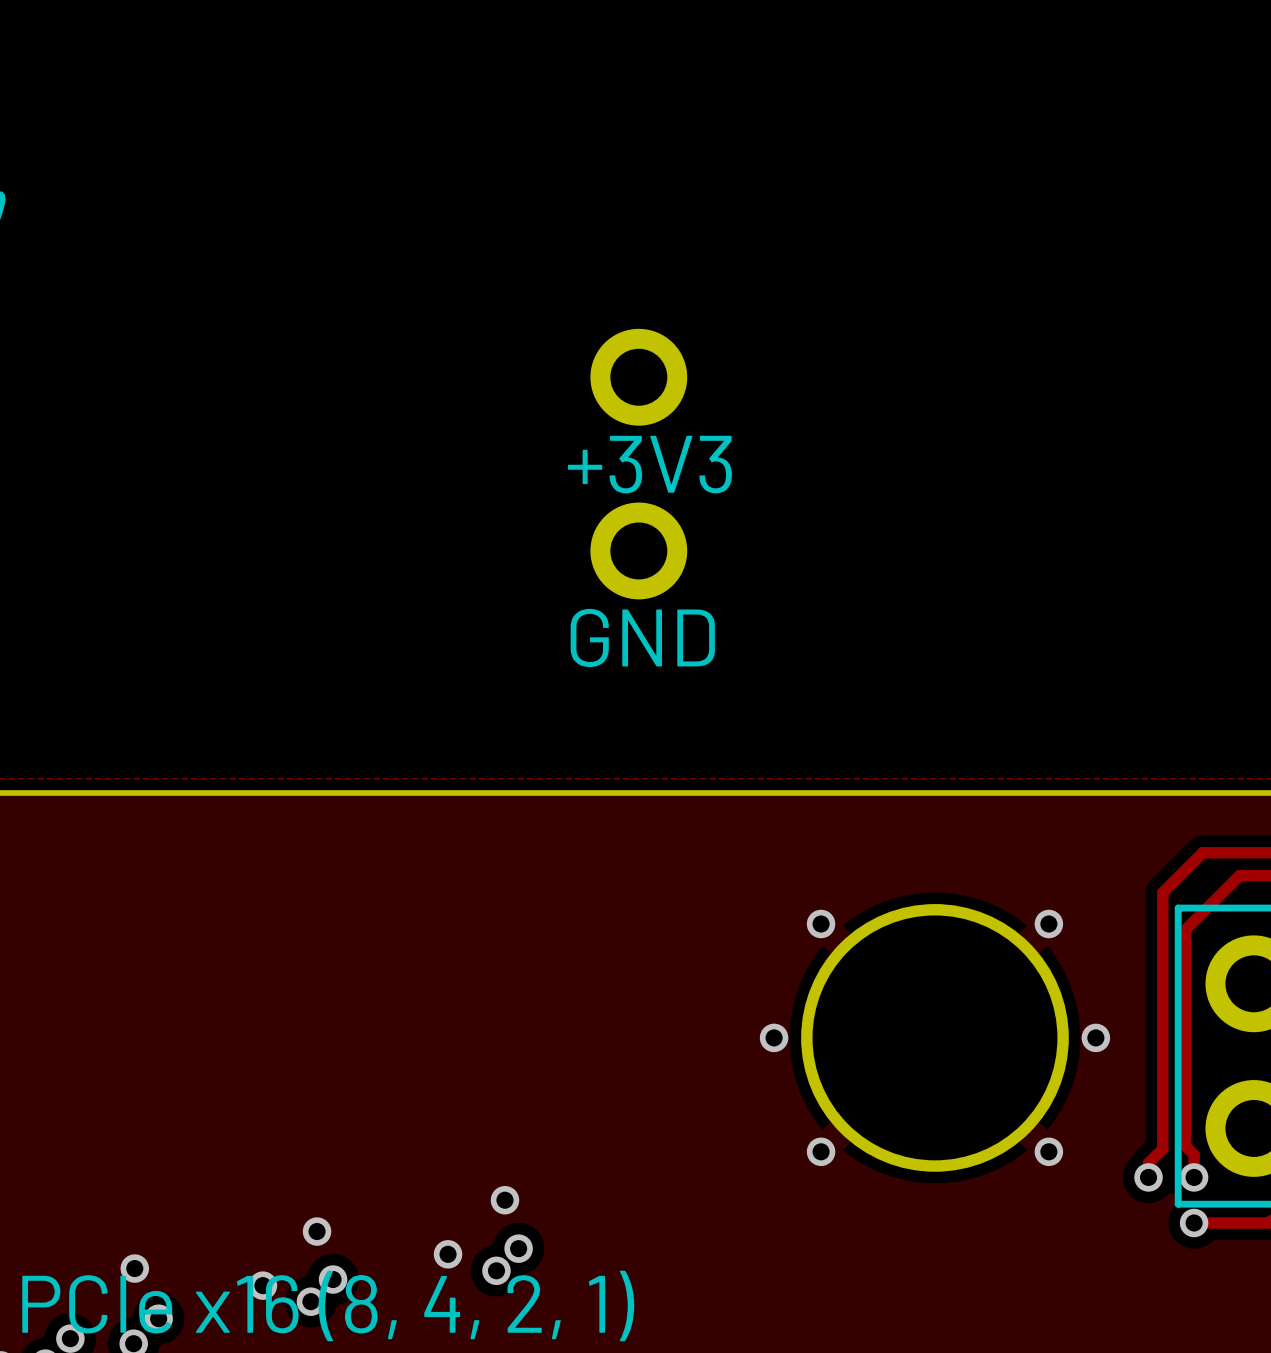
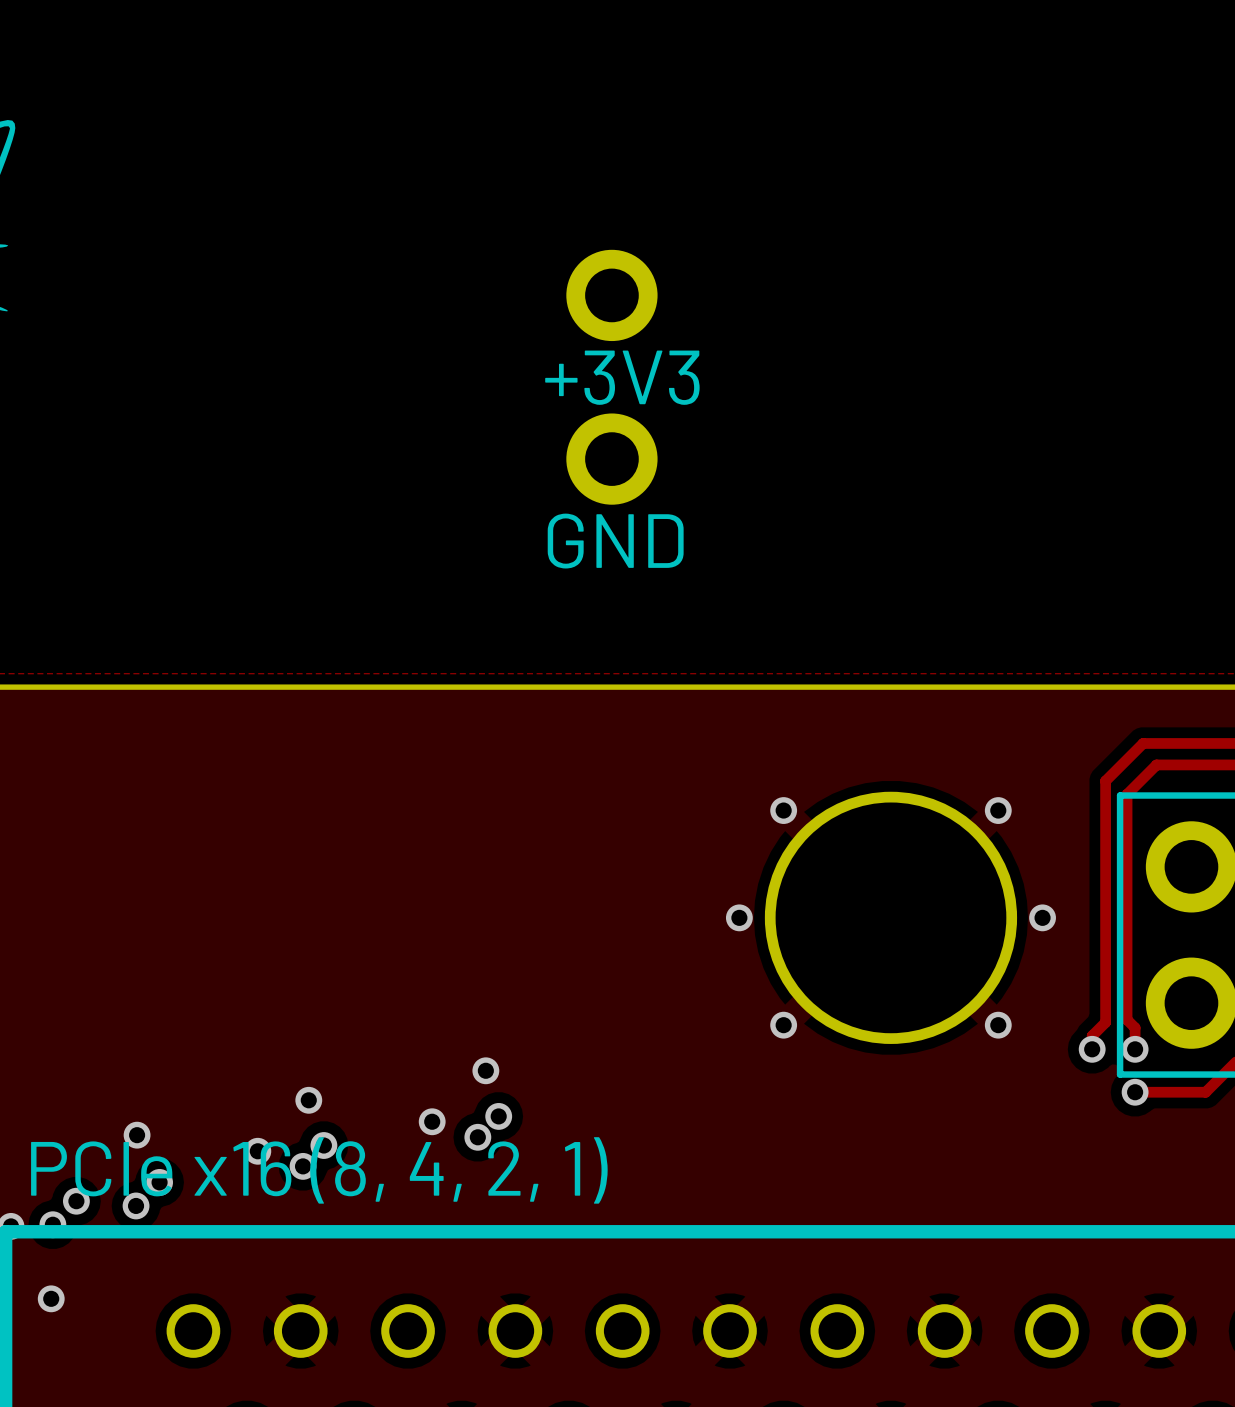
track: (1239, 875) (1185, 929) -> (1178, 764) (1156, 764) (1127, 794) (1127, 815)

